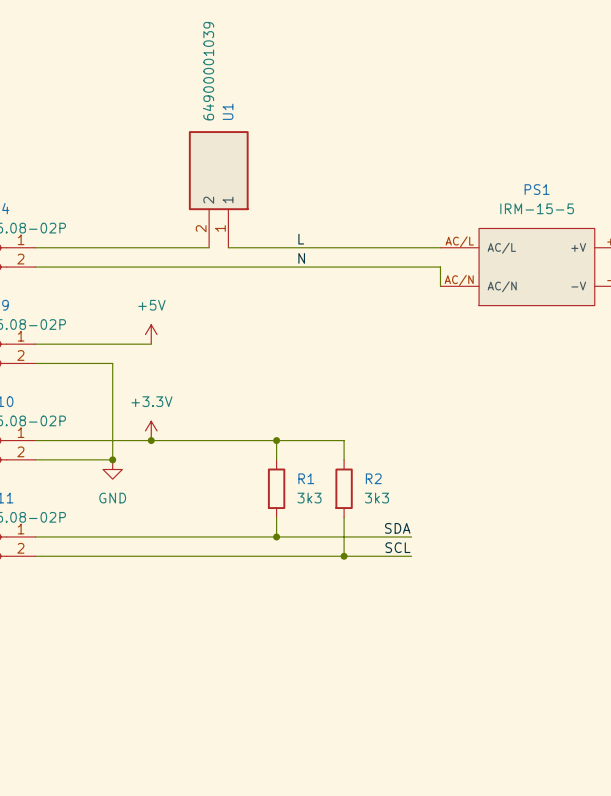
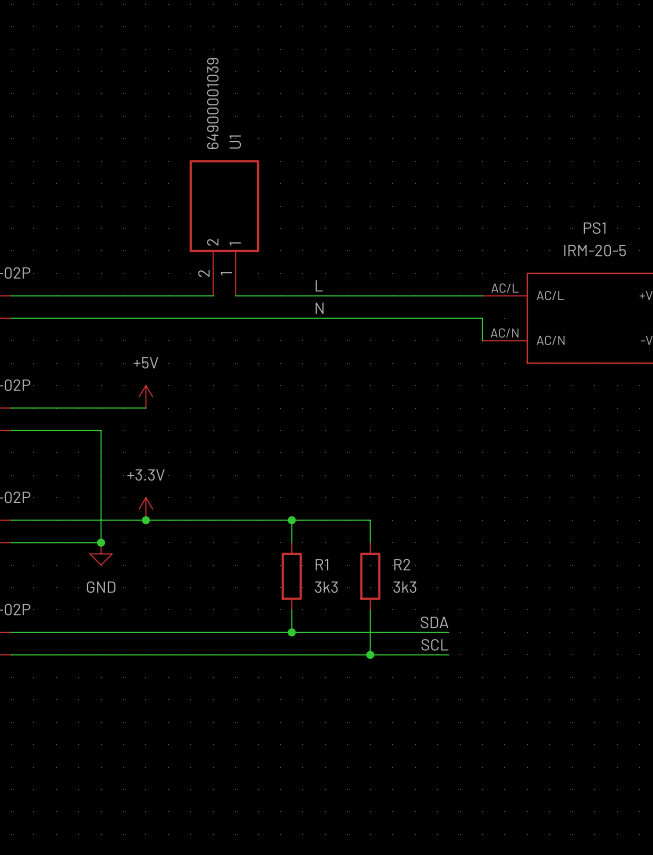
PS1 value: IRM-15-5 (537, 208) -> IRM-20-5 (595, 250)

